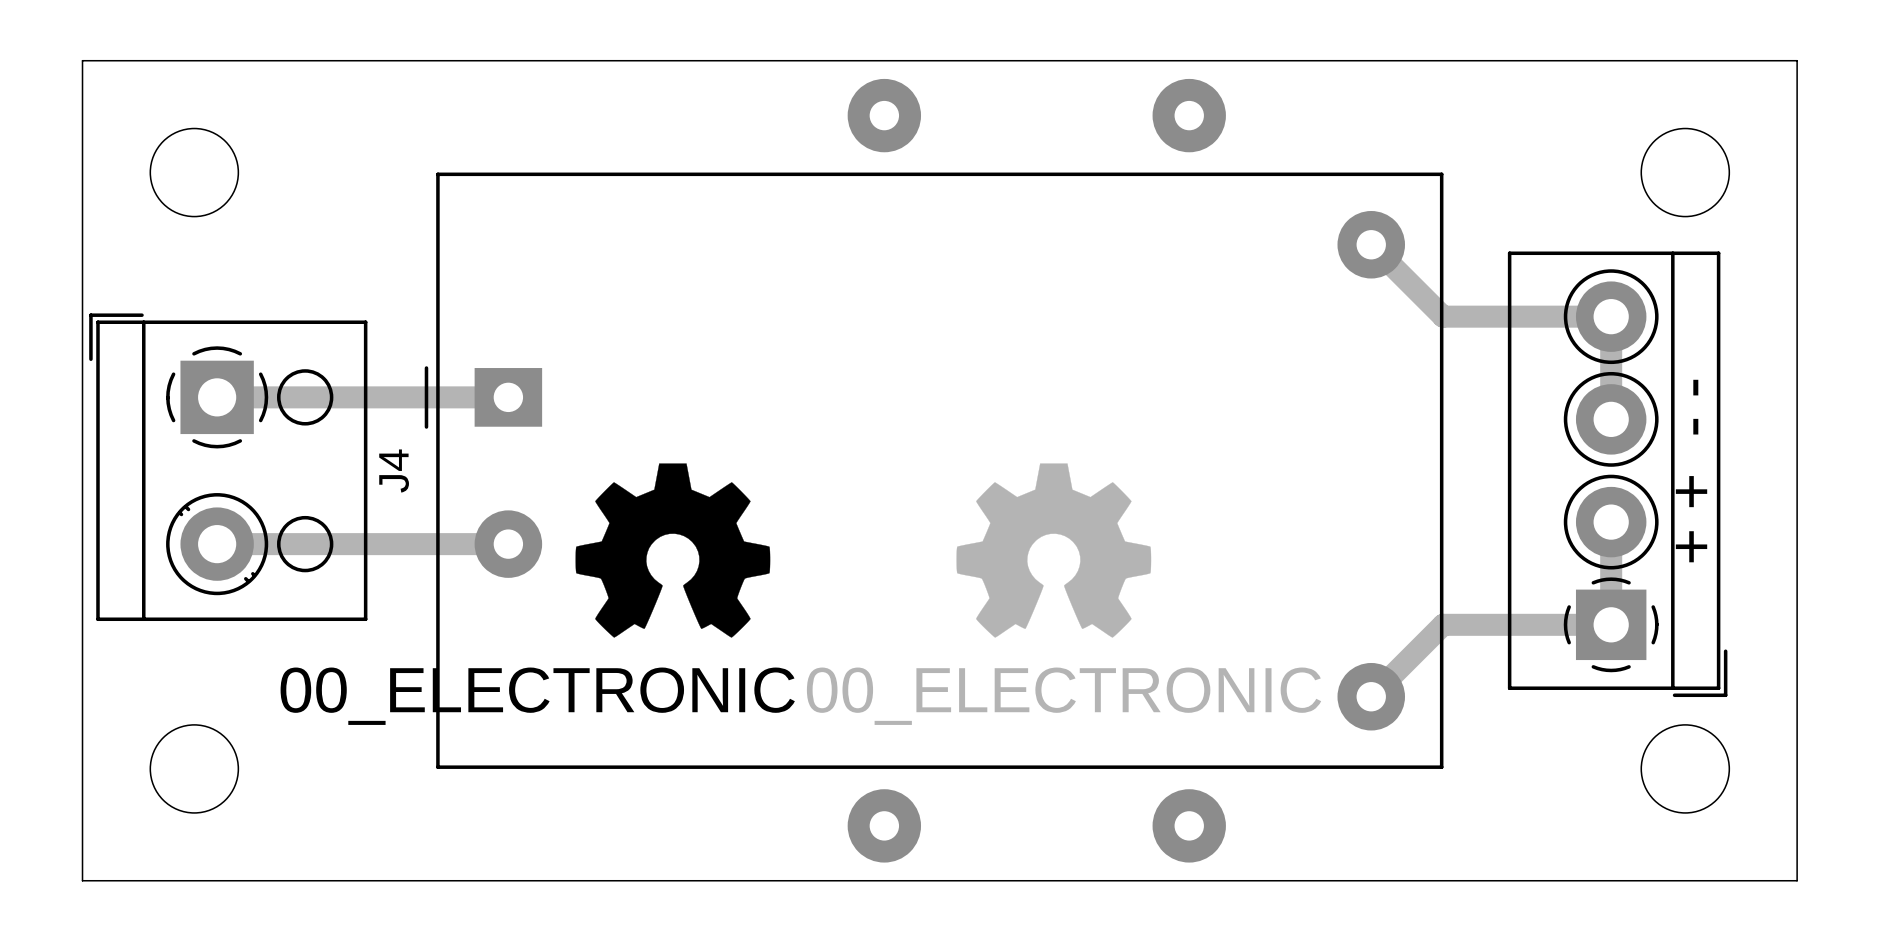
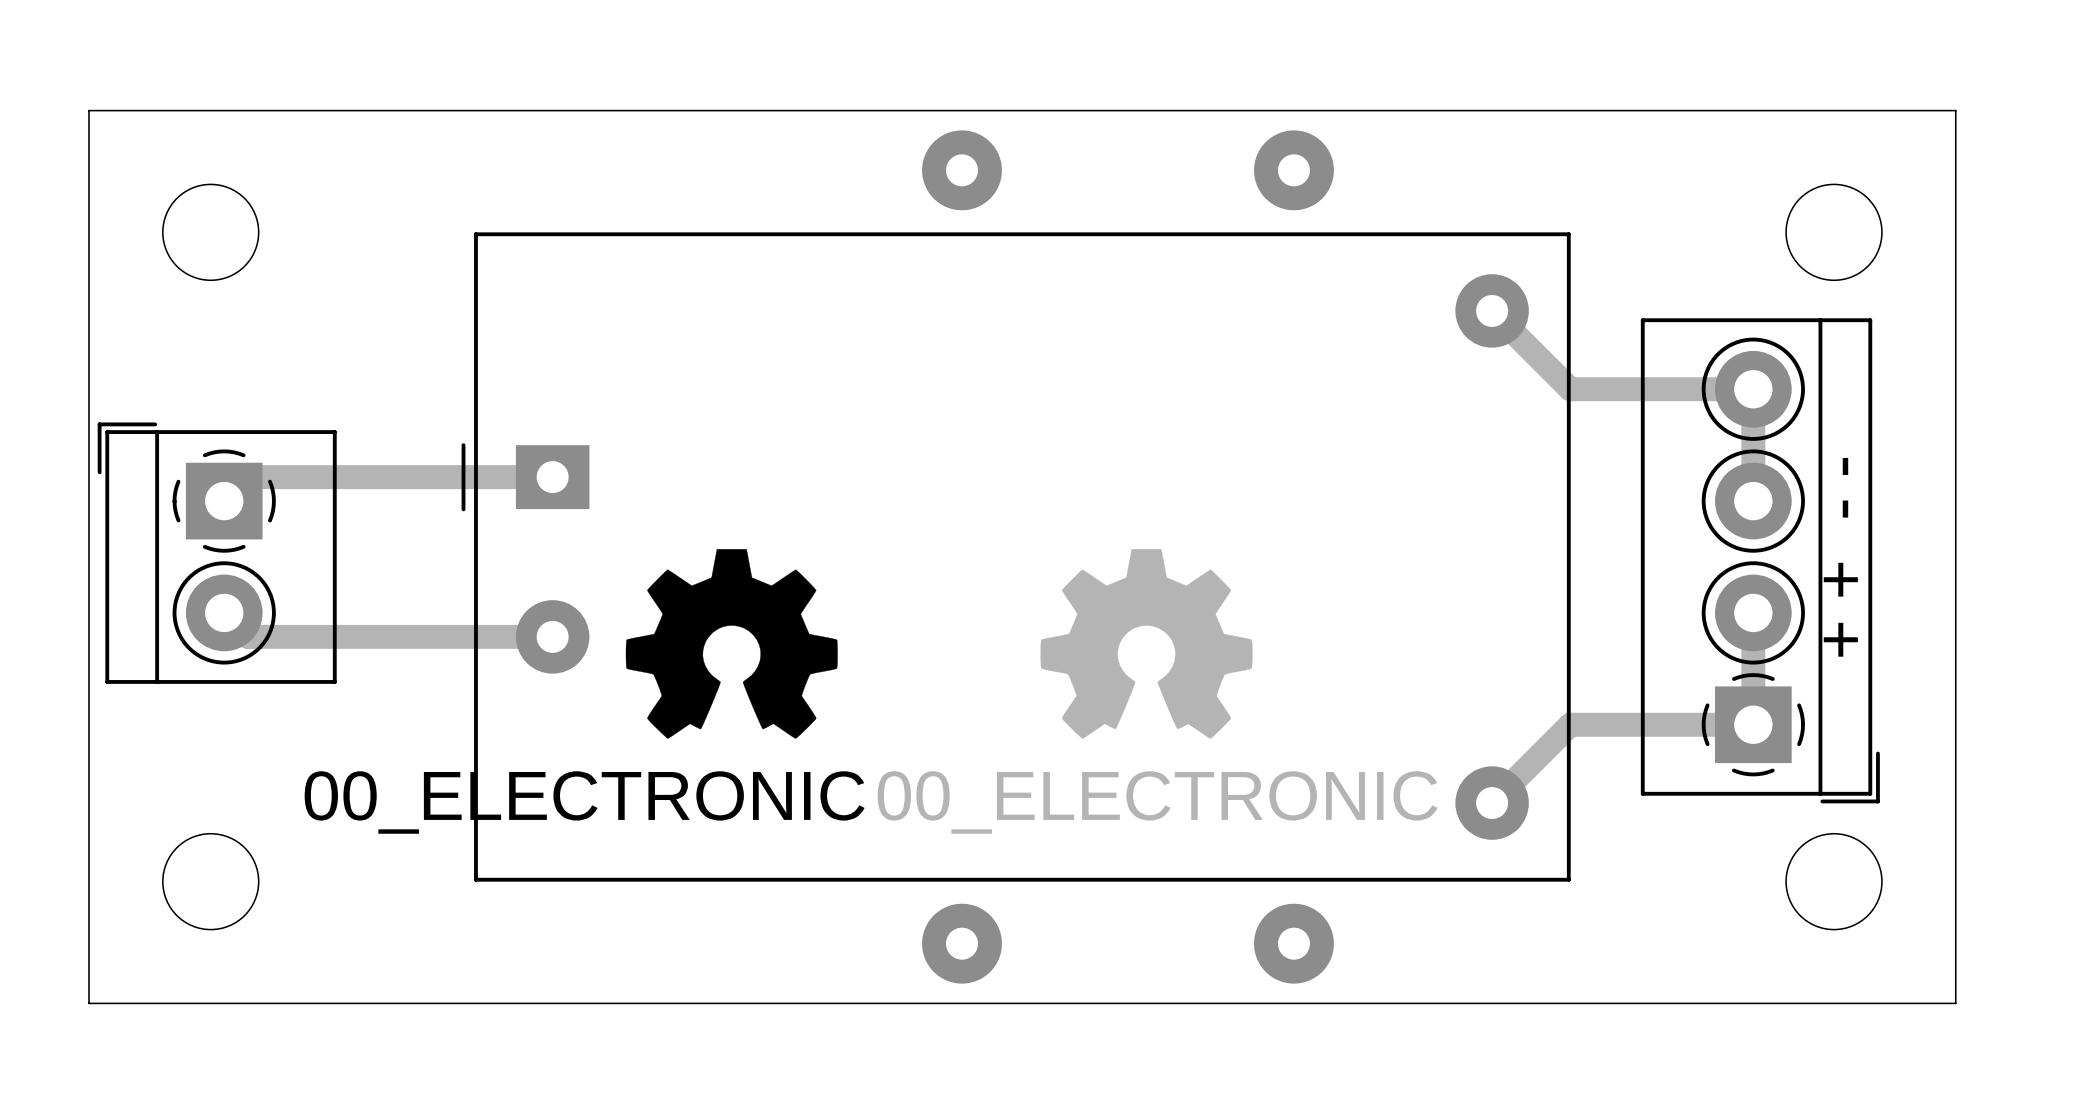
part: none -> (217, 553)
J4: (228, 467) -> none

